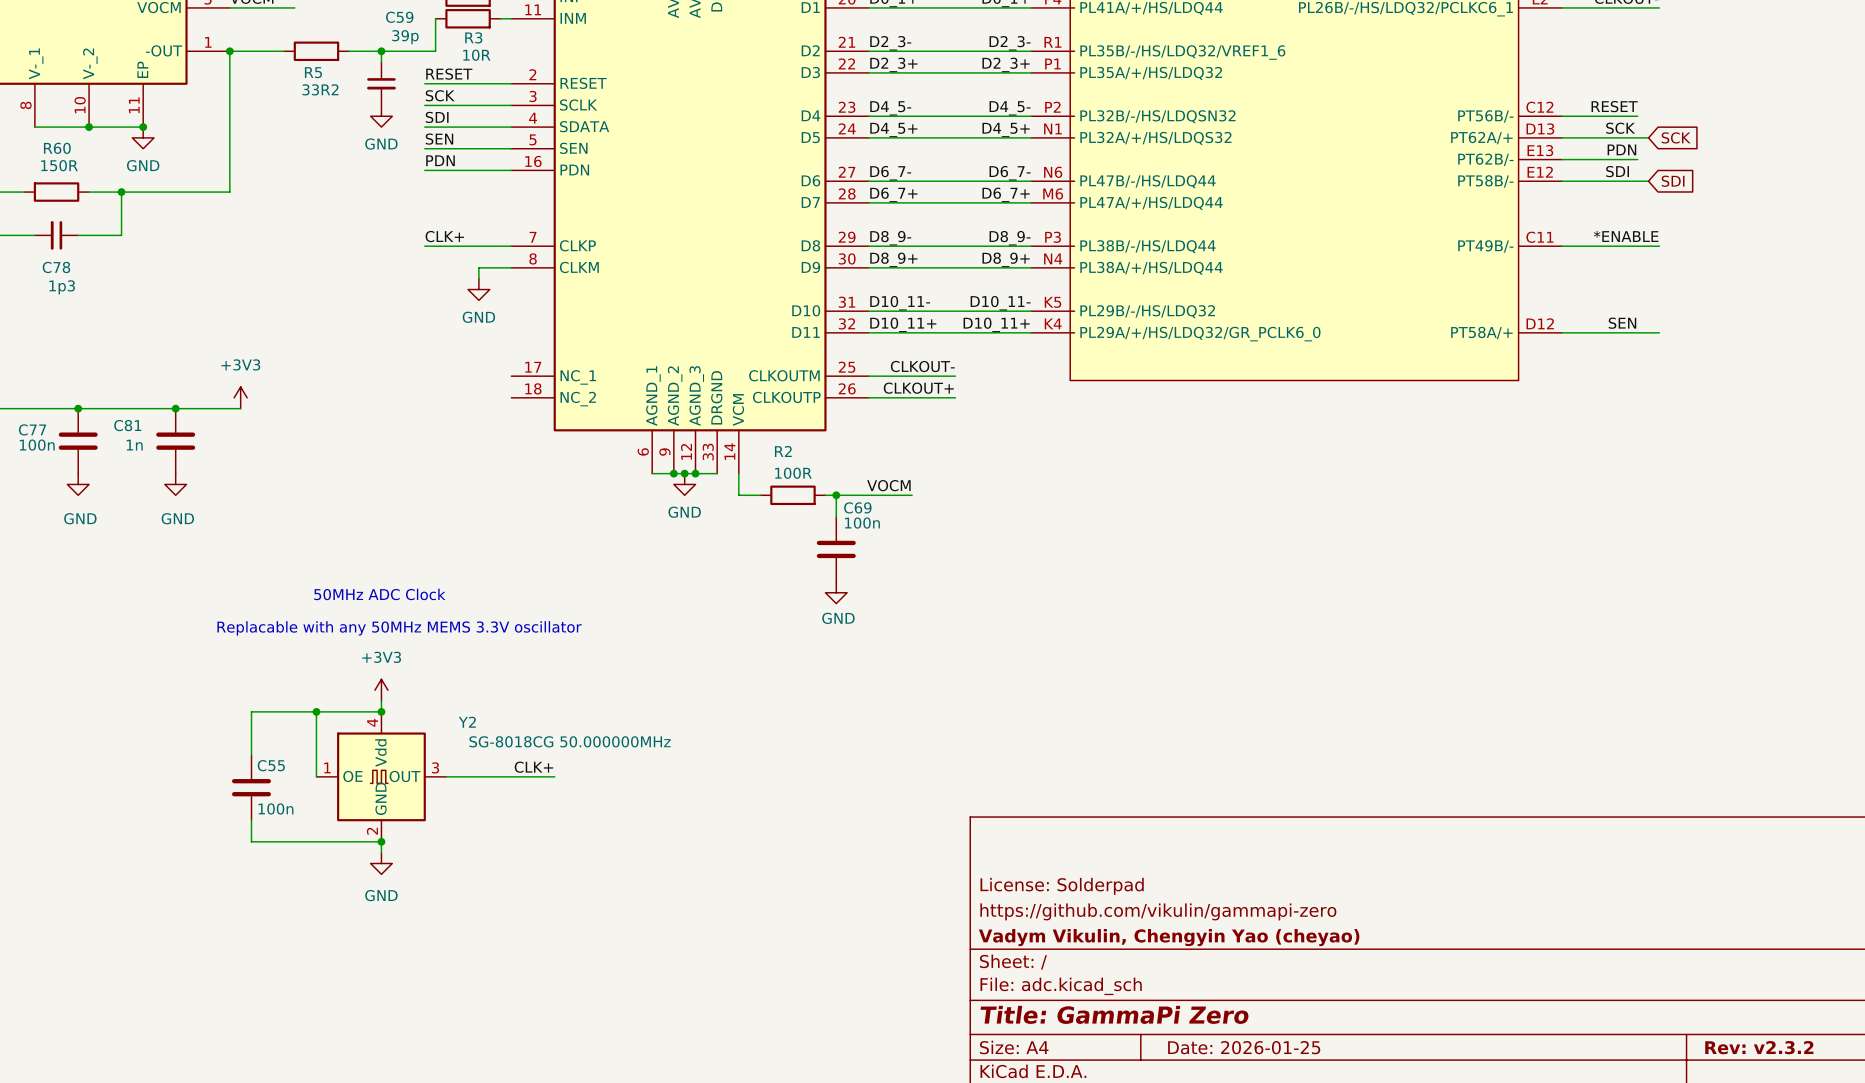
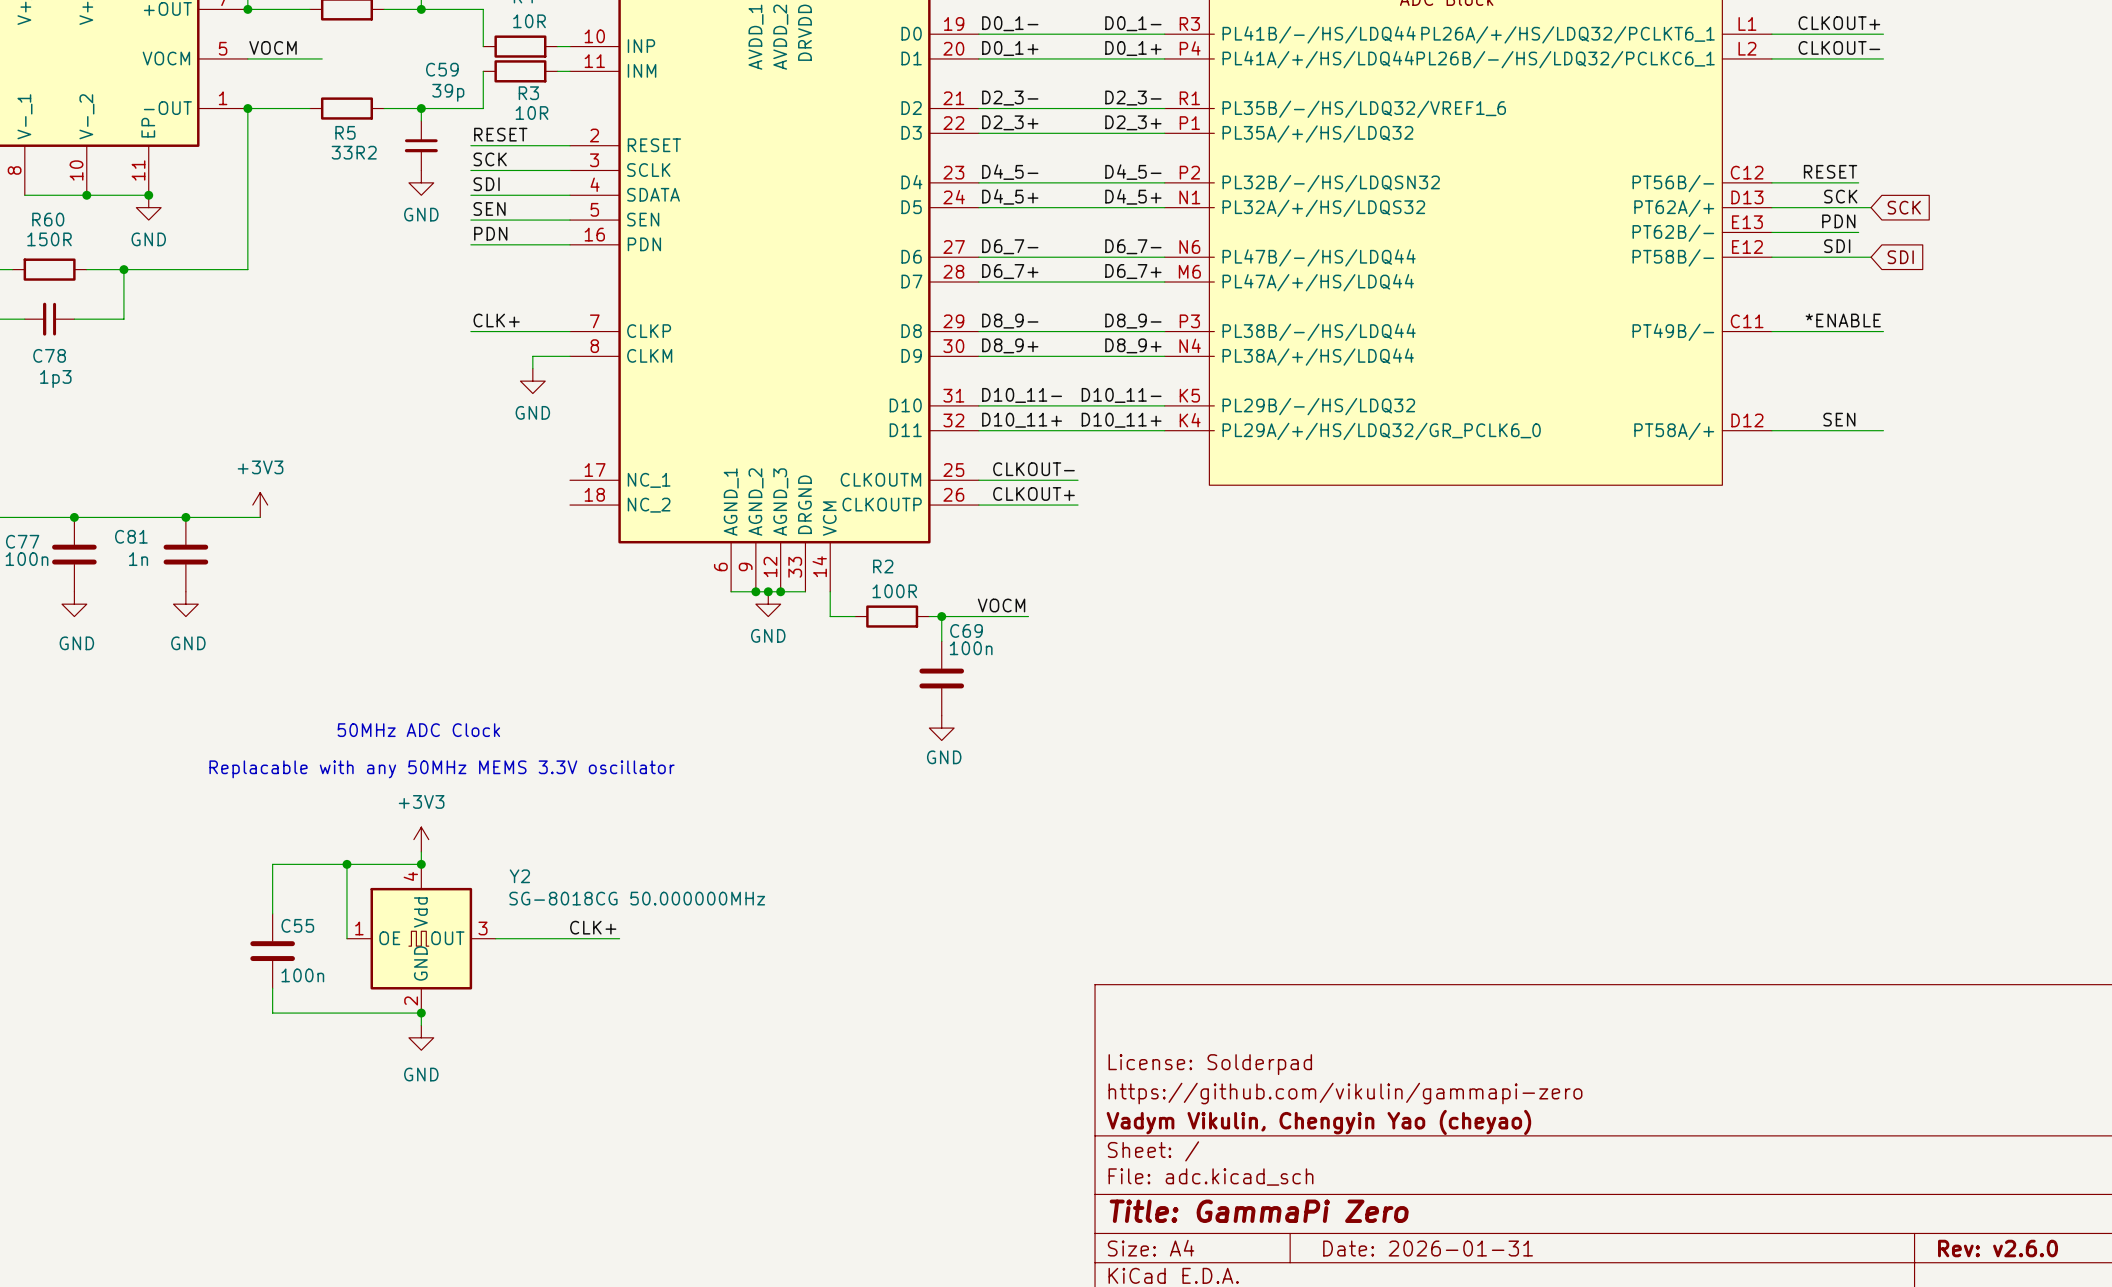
title block: Date: 2026-01-25 (1244, 1047) -> Date: 2026-01-31 (1428, 1248)
title block: Rev: v2.3.2 (1759, 1047) -> Rev: v2.6.0 (1998, 1248)

